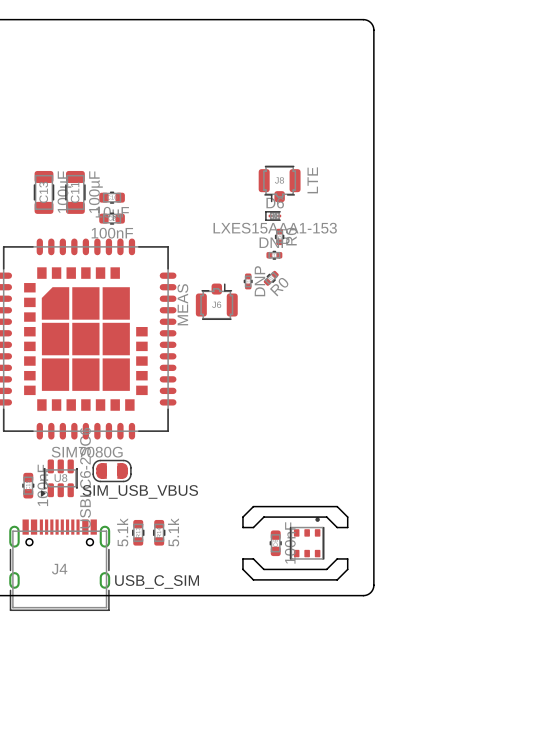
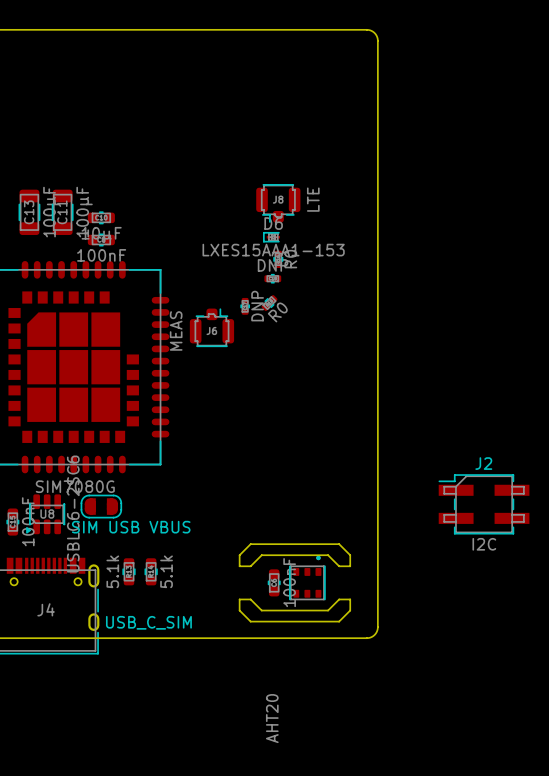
J2: none -> I2C (484, 504)
part value: SIM_USB_VBUS (140, 491) -> SIM USB VBUS (131, 527)
part value: none -> AHT20 (272, 718)

